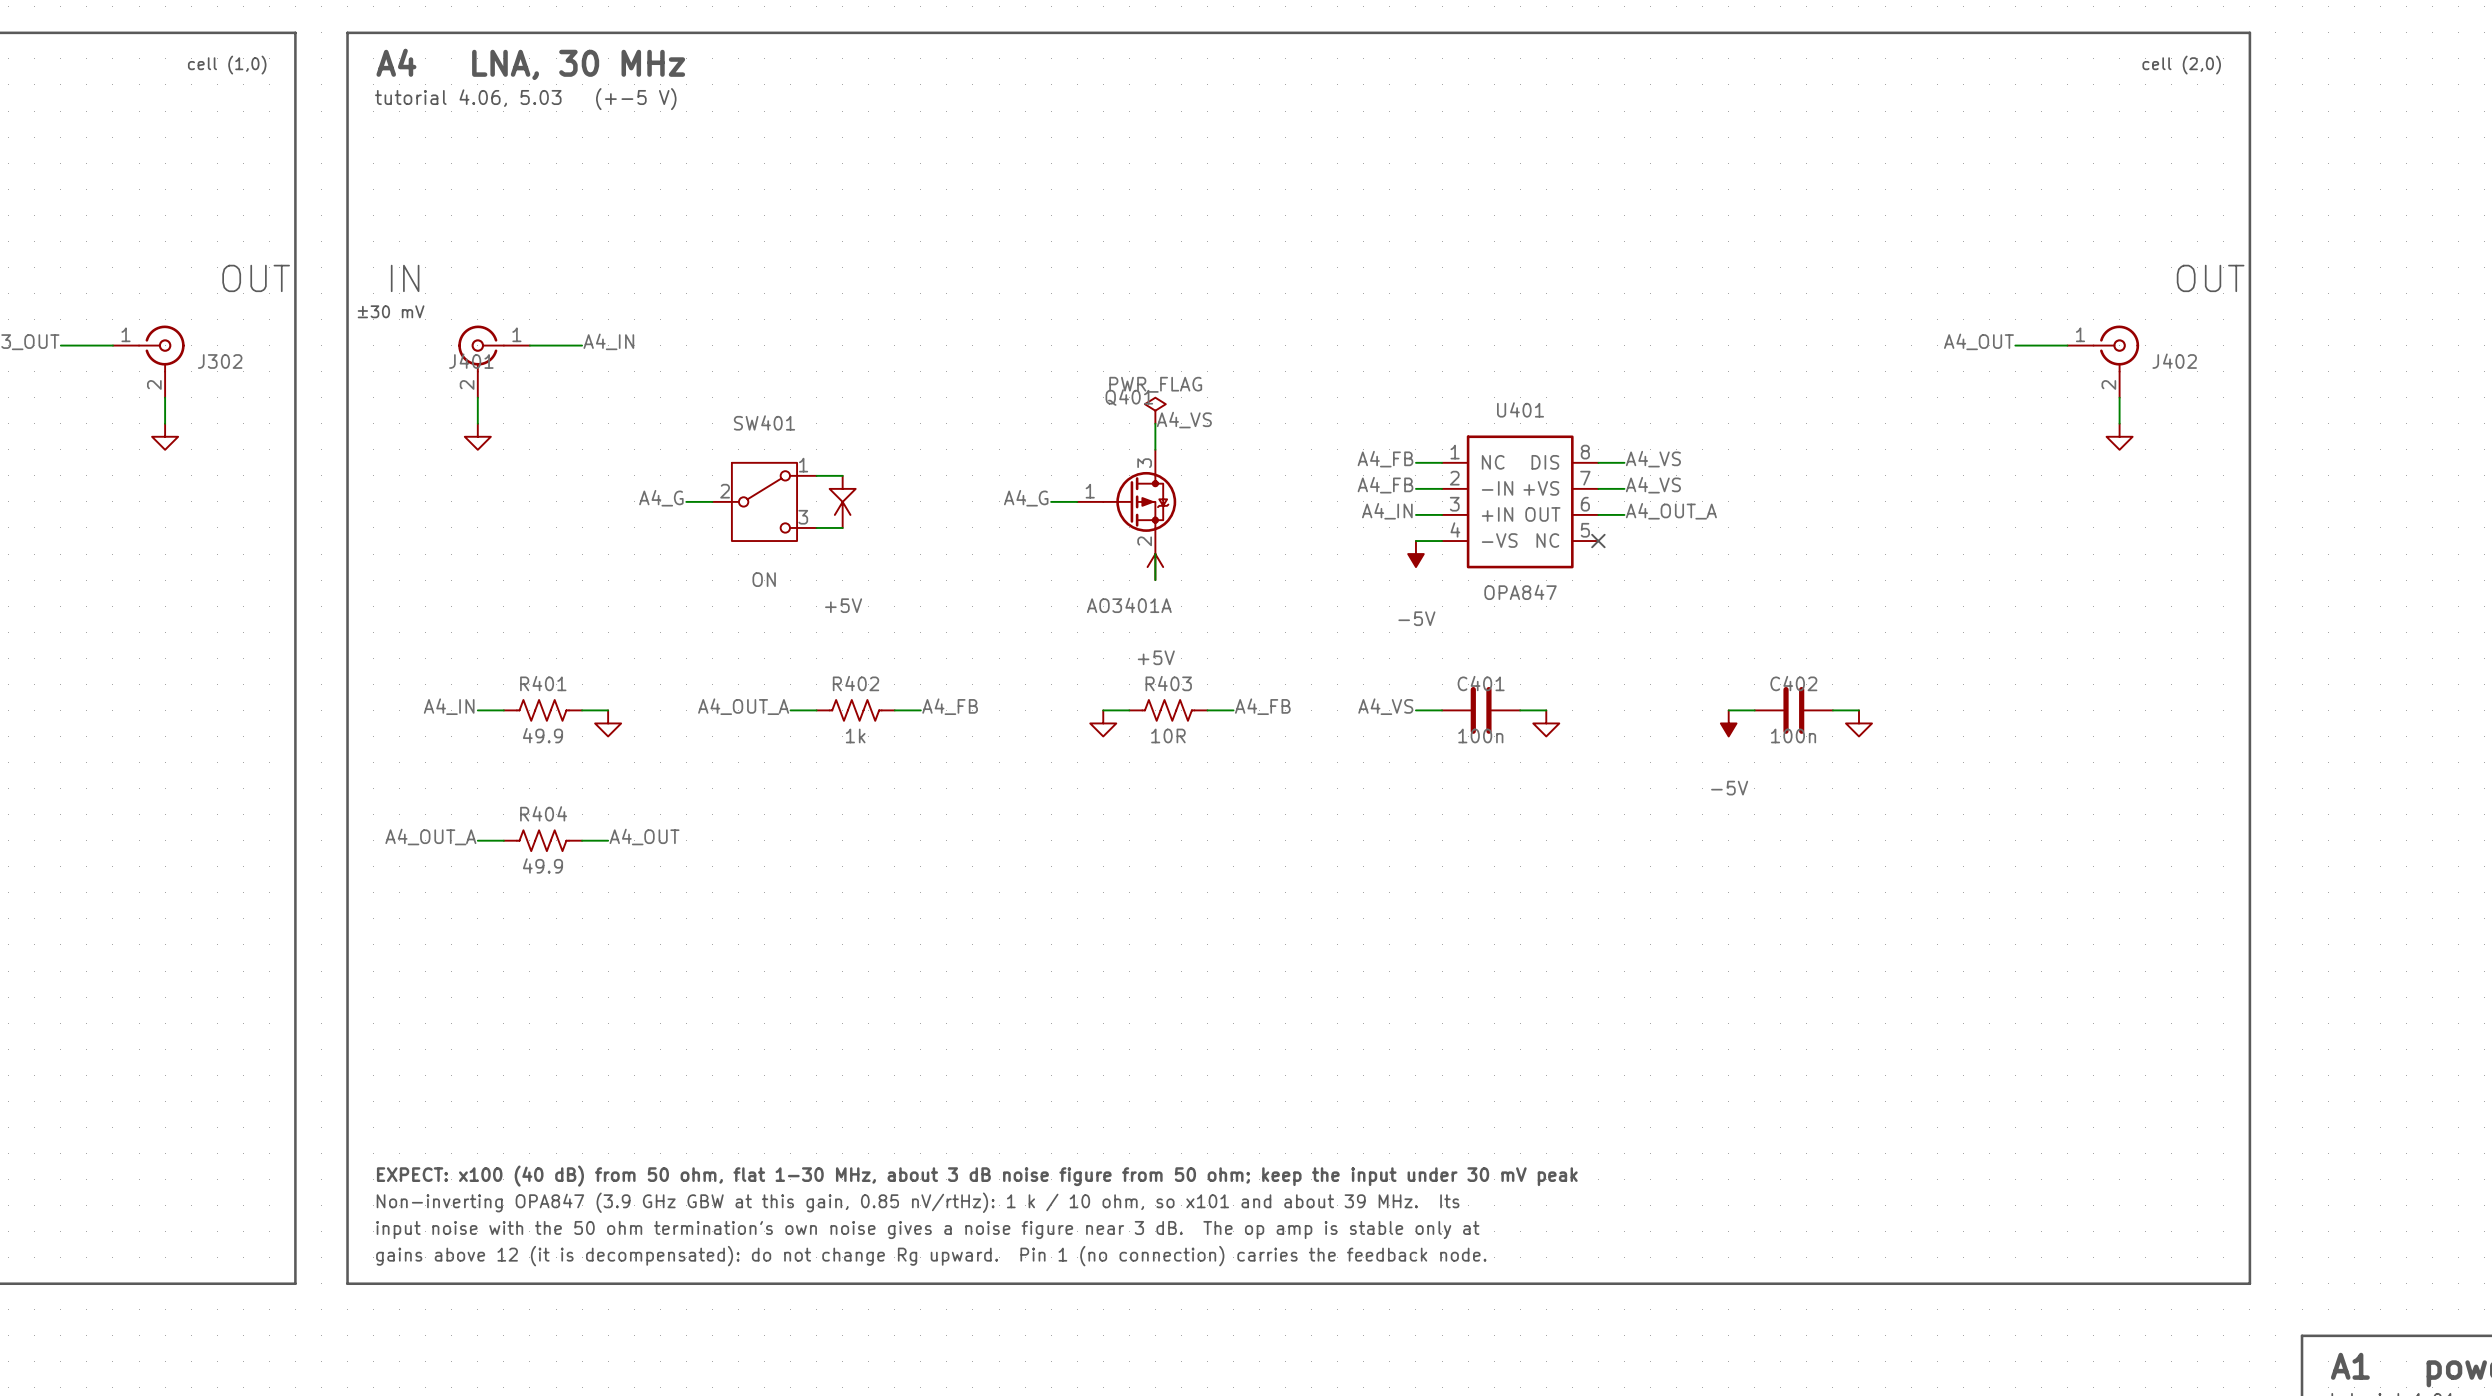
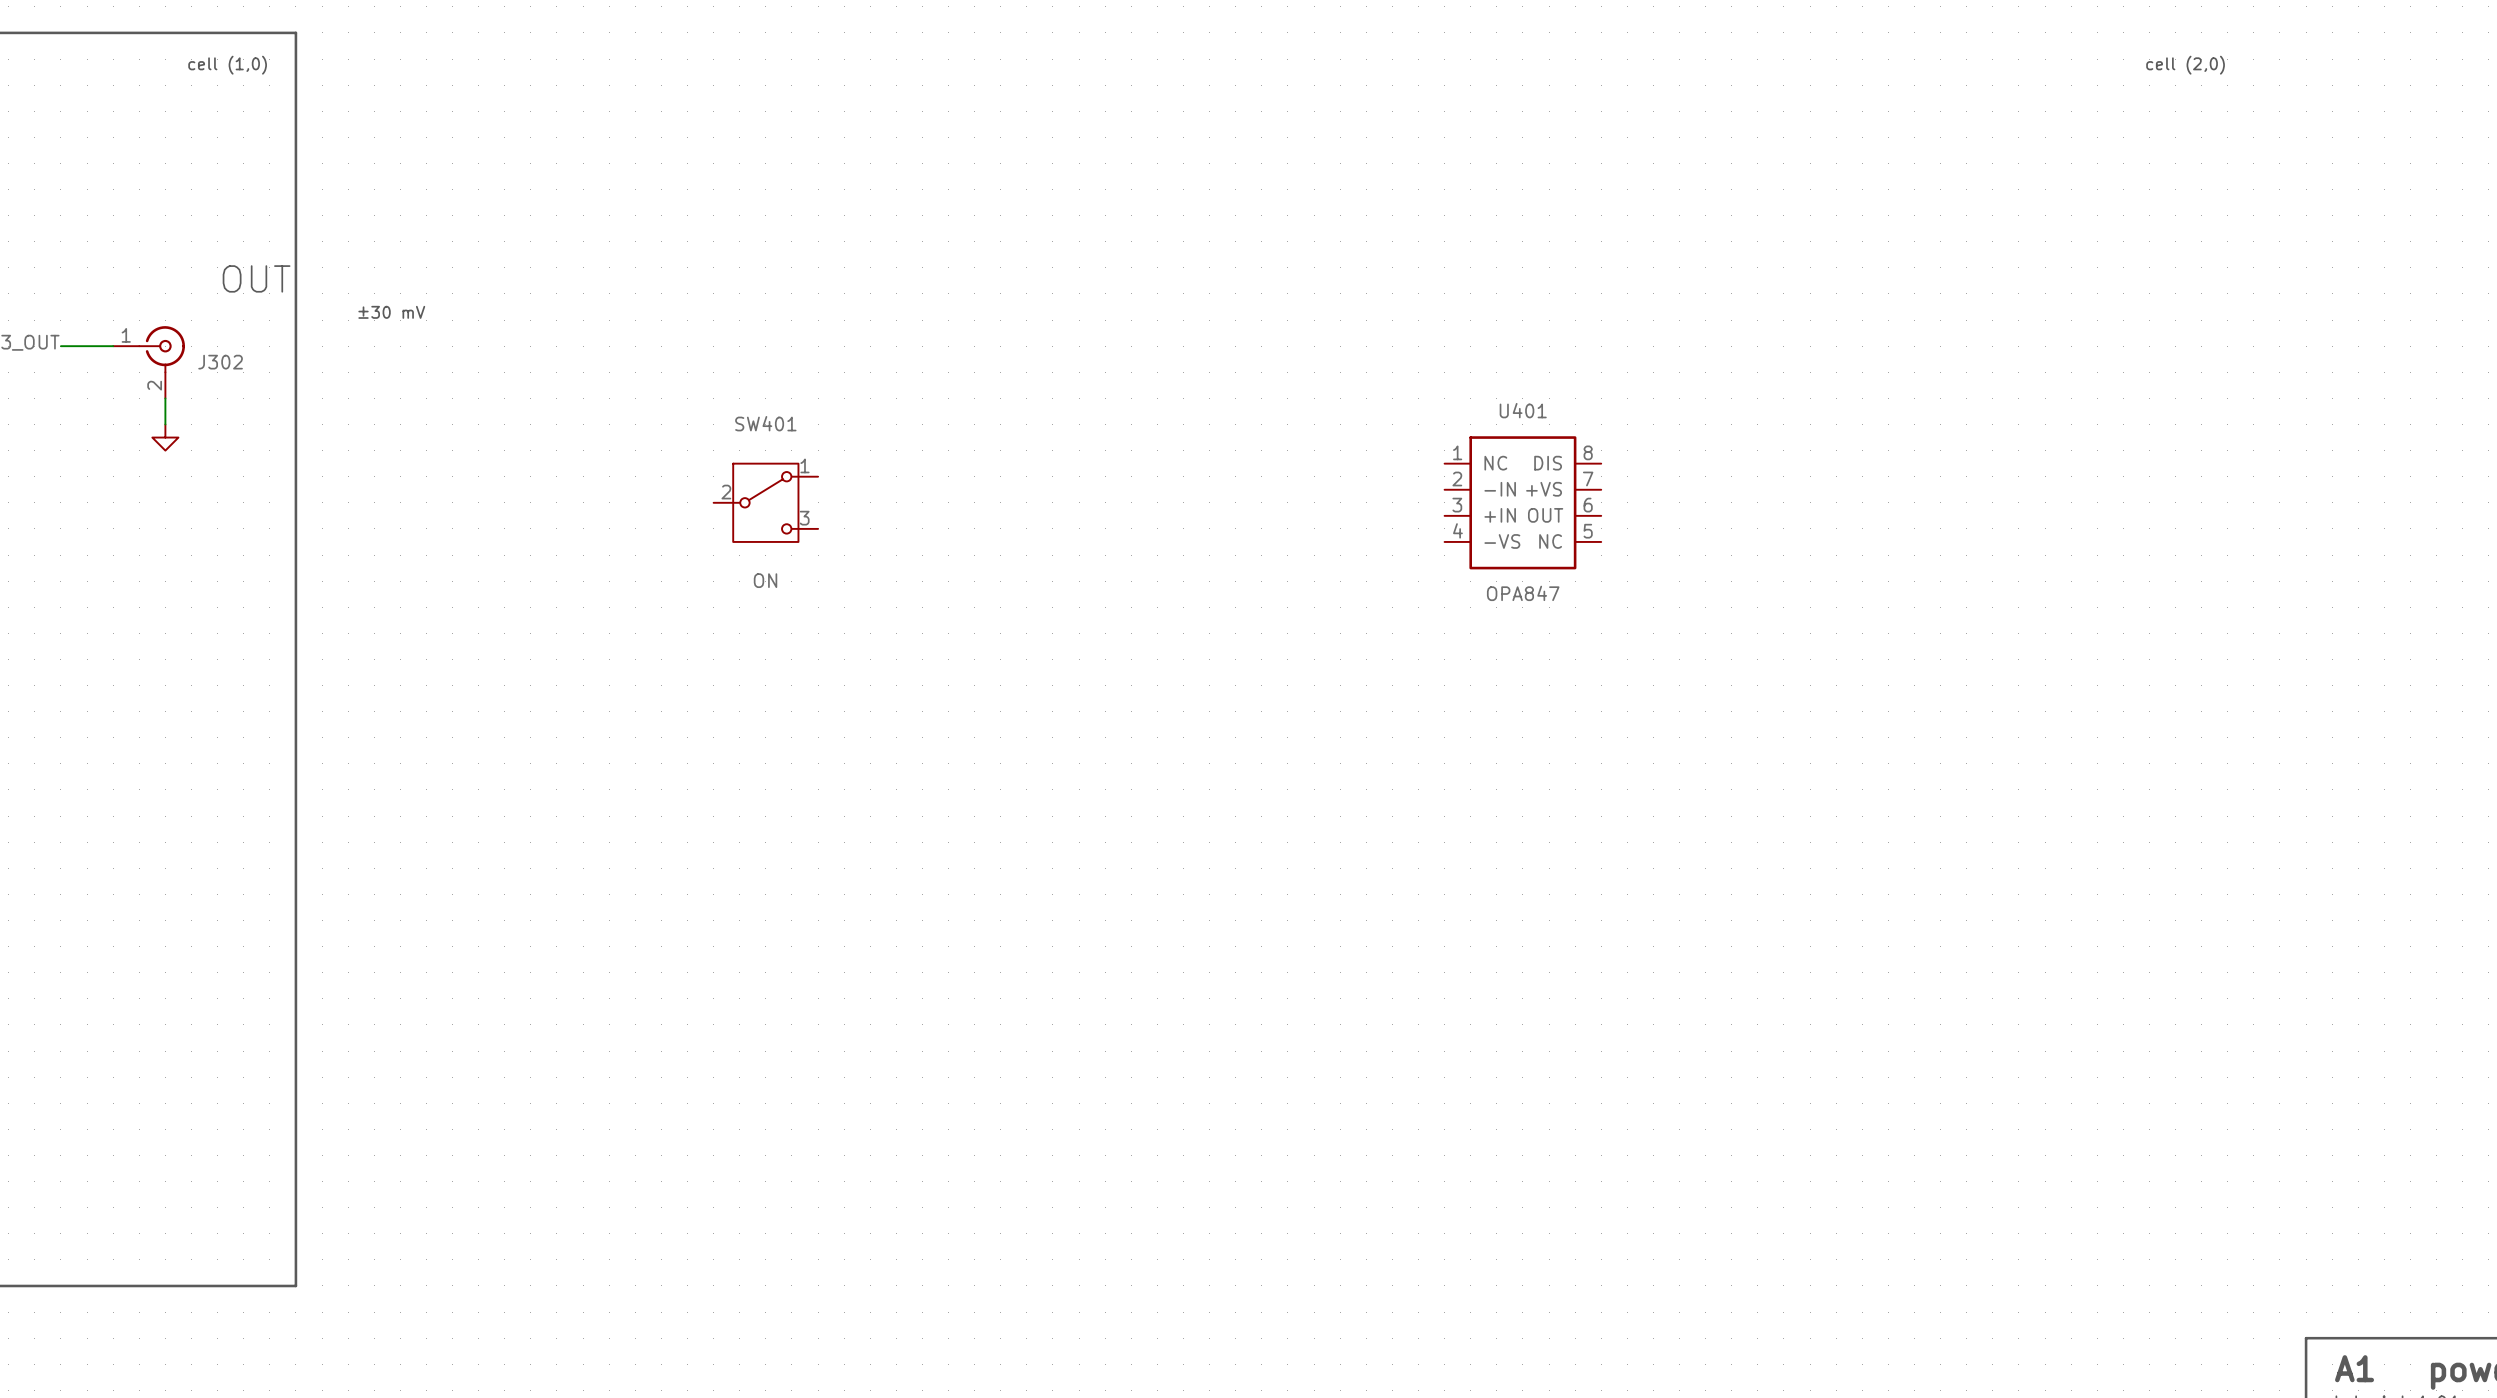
line: (347, 32) (2249, 32) (2249, 1283) (347, 1283) (347, 32) -> none
text: A4 LNA, 30 MHz (530, 64) -> none
text: tutorial 4.06, 5.03 (+-5 V) (525, 99) -> none
text: IN (405, 278) -> none
text: OUT (2210, 278) -> none
label: A4_IN (608, 341) -> none
label: A4_OUT (1978, 341) -> none
wire: (529, 345) (582, 345) -> none
wire: (2015, 345) (2067, 345) -> none
J401: (494, 361) -> none
J402: (2103, 361) -> none
wire: (477, 397) (477, 423) -> none
wire: (2119, 397) (2119, 423) -> none
power symbol: PWR_FLAG (1155, 410) -> none
label: A4_VS (1184, 420) -> none
wire: (1155, 423) (1155, 449) -> none
power symbol: (477, 436) -> none
power symbol: (2119, 436) -> none
label: A4_FB (1385, 459) -> none
label: A4_VS (1653, 459) -> none
wire: (1415, 462) (1442, 462) -> none
wire: (1598, 462) (1624, 462) -> none
wire: (816, 475) (842, 475) -> none
label: A4_FB (1385, 485) -> none
label: A4_VS (1653, 485) -> none
power symbol: (842, 488) -> none
wire: (1415, 488) (1442, 488) -> none
wire: (1598, 488) (1624, 488) -> none
label: A4_G (661, 498) -> none
label: A4_G (1026, 498) -> none
wire: (686, 501) (712, 501) -> none
wire: (1051, 501) (1077, 501) -> none
Q401: AO3401A (1126, 501) -> none
label: A4_IN (1387, 511) -> none
label: A4_OUT_A (1671, 511) -> none
power symbol: +5V (842, 514) -> none
wire: (1415, 514) (1442, 514) -> none
wire: (1598, 514) (1624, 514) -> none
wire: (816, 527) (842, 527) -> none
wire: (1415, 541) (1442, 541) -> none
no-connect mark: (1598, 541) -> none
wire: (1155, 554) (1155, 580) -> none
power symbol: -5V (1415, 554) -> none
power symbol: +5V (1155, 567) -> none
label: A4_IN (449, 706) -> none
label: A4_OUT_A (743, 706) -> none
label: A4_FB (950, 706) -> none
label: A4_FB (1262, 706) -> none
label: A4_VS (1385, 706) -> none
wire: (477, 710) (503, 710) -> none
R401: 49.9 (542, 710) -> none
wire: (582, 710) (608, 710) -> none
wire: (790, 710) (816, 710) -> none
R402: 1k (855, 710) -> none
wire: (894, 710) (920, 710) -> none
wire: (1103, 710) (1129, 710) -> none
R403: 10R (1168, 710) -> none
wire: (1207, 710) (1233, 710) -> none
wire: (1415, 710) (1442, 710) -> none
C401: 100n (1481, 710) -> none
wire: (1520, 710) (1546, 710) -> none
wire: (1728, 710) (1754, 710) -> none
C402: 100n (1793, 710) -> none
wire: (1832, 710) (1858, 710) -> none
power symbol: (608, 723) -> none
power symbol: (1103, 723) -> none
power symbol: (1546, 723) -> none
power symbol: -5V (1728, 723) -> none
power symbol: (1858, 723) -> none
label: A4_OUT_A (430, 837) -> none
label: A4_OUT (644, 837) -> none
wire: (477, 840) (503, 840) -> none
R404: 49.9 (542, 840) -> none
wire: (582, 840) (608, 840) -> none
text: EXPECT: x100 (40 dB) from 50 ohm, flat 1-30 MHz, about 3 dB noise figure from 50 ohm; keep the input under 30 mV peak (977, 1176) -> none
text: Non-inverting OPA847 (3.9 GHz GBW at this gain, 0.85 nV/rtHz): 1 k / 10 ohm, so x101 and about 39 MHz. Its (918, 1202) -> none
text: input noise with the 50 ohm termination's own noise gives a noise figure near 3 dB. The op amp is stable only at (927, 1230) -> none
text: gains above 12 (it is decompensated): do not change Rg upward. Pin 1 (no connection) carries the feedback node. (931, 1256) -> none

